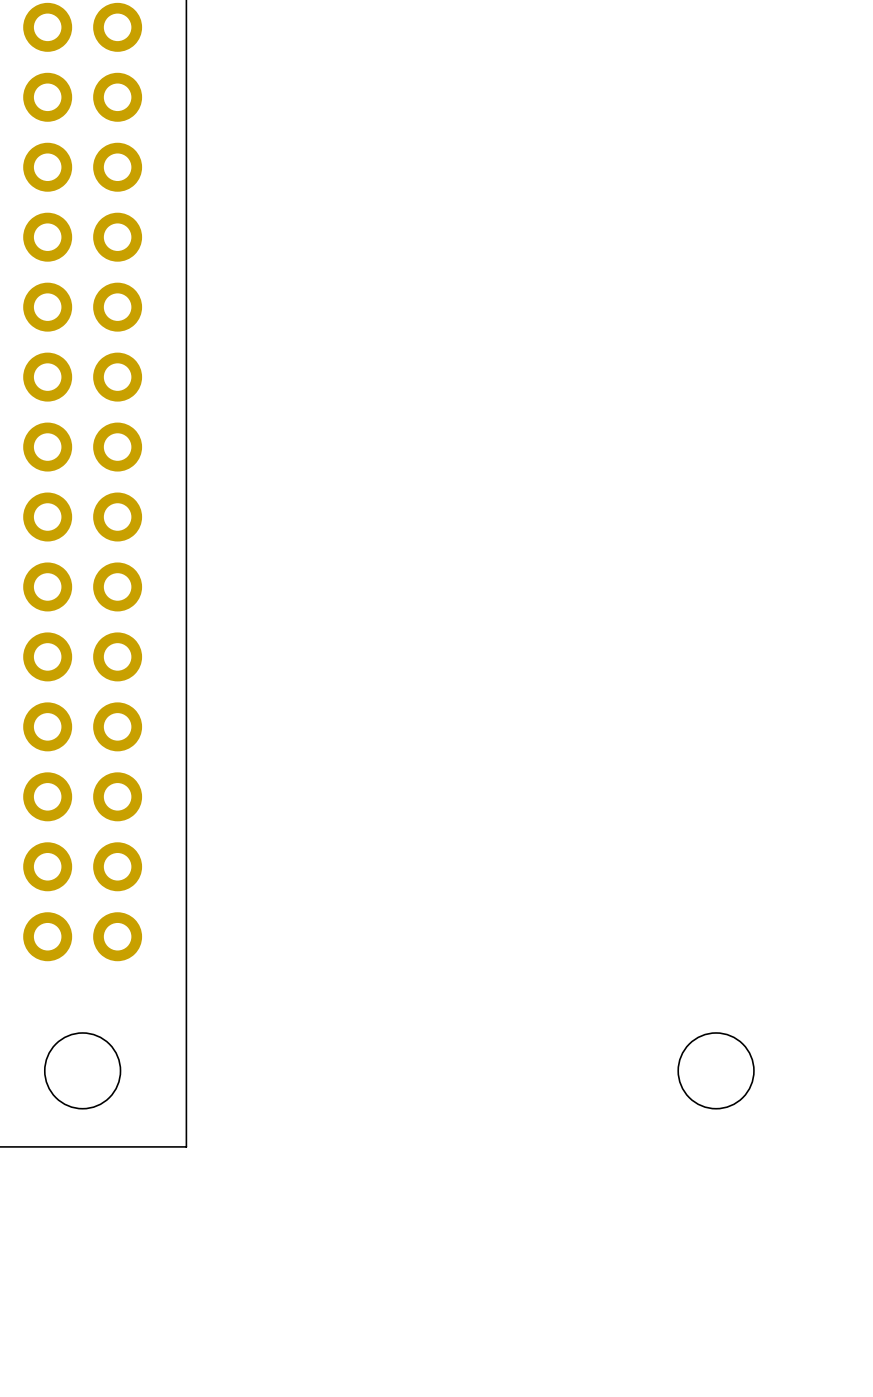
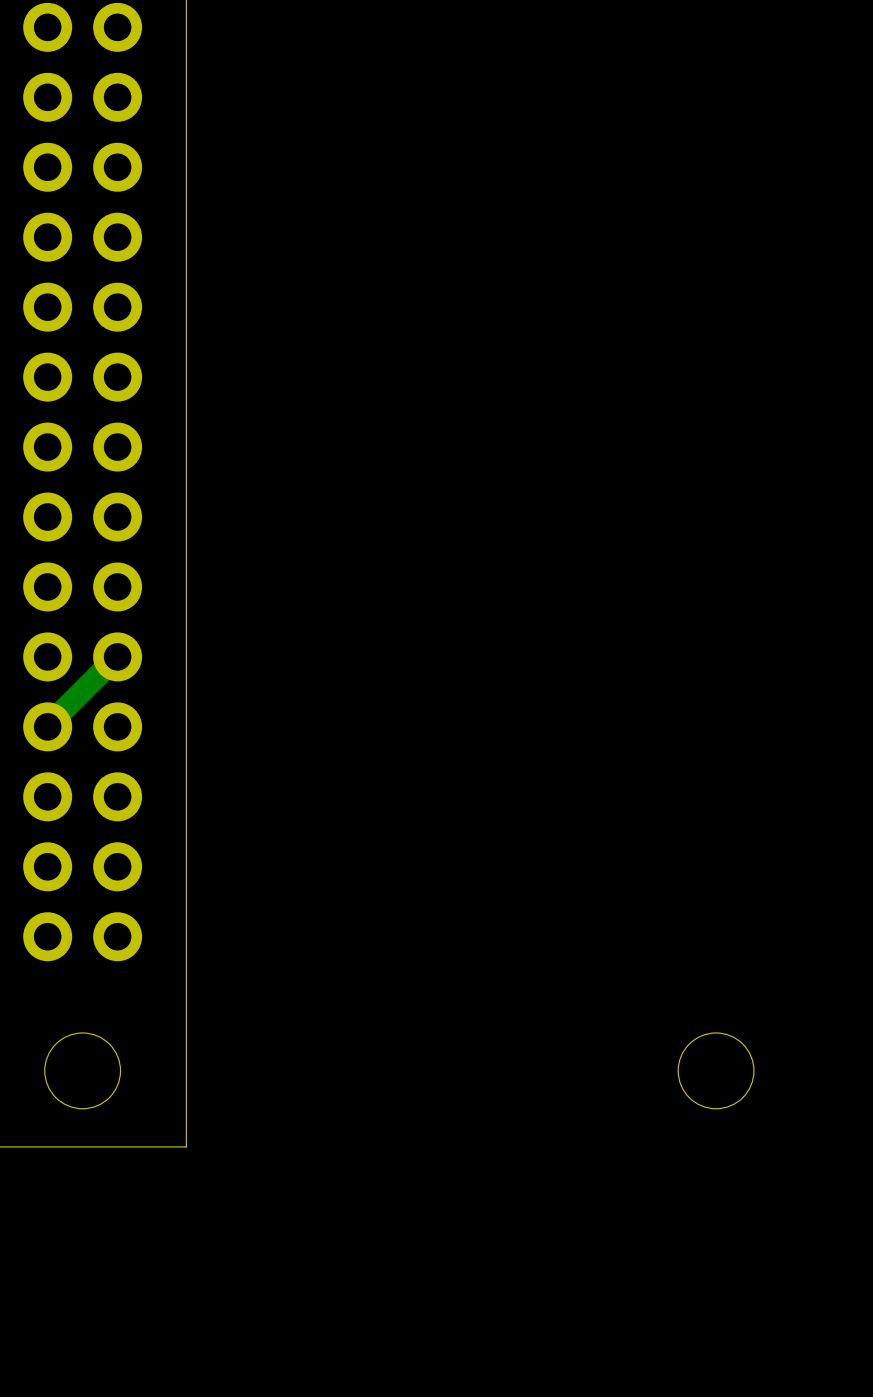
track: none -> (117, 656) (47, 726)

